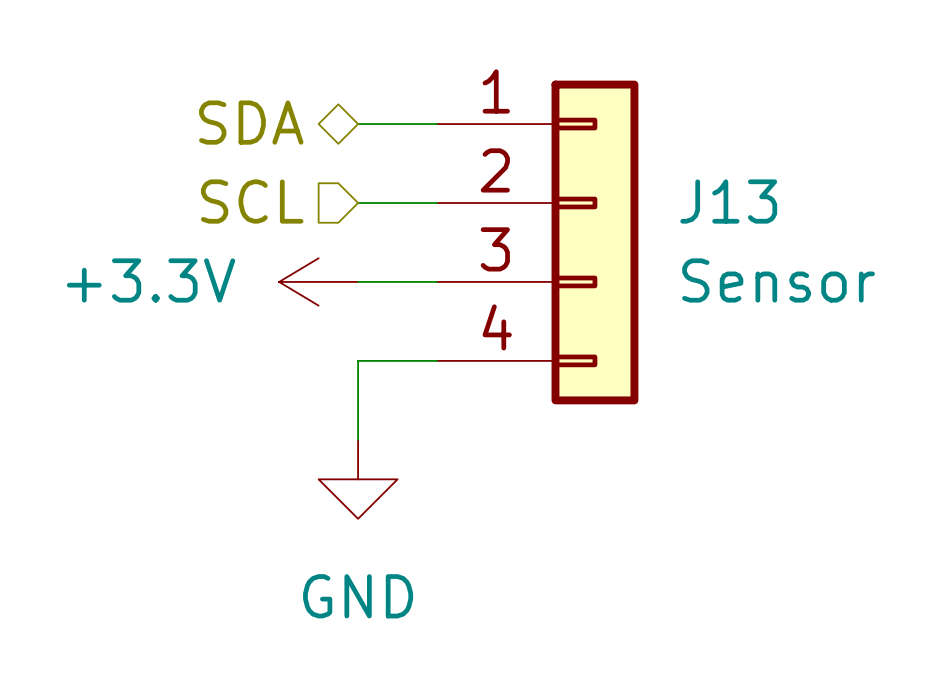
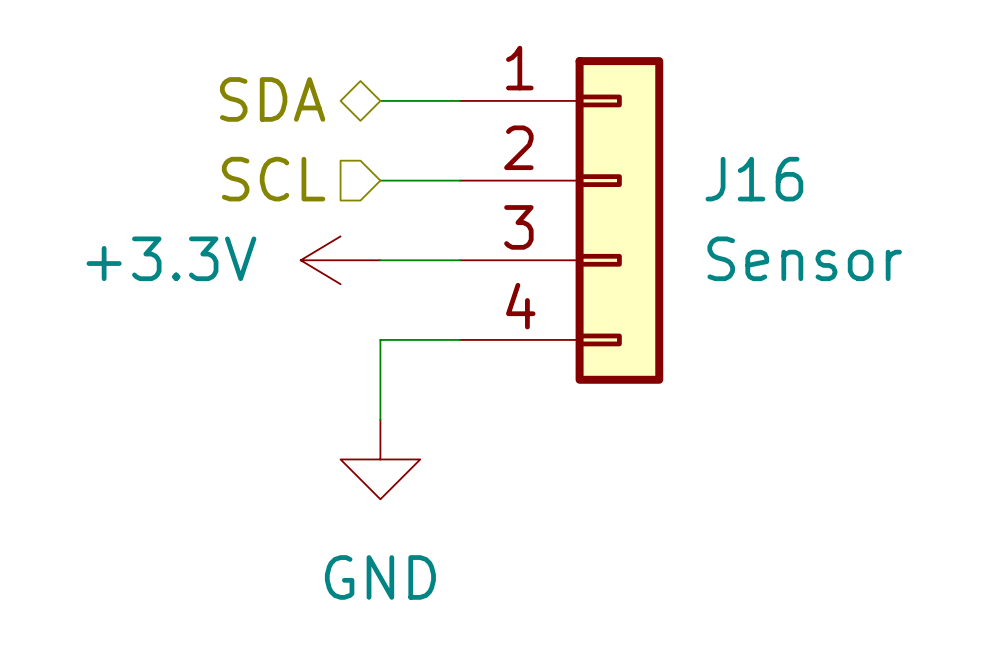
J13 name: J13 (728, 201) -> J16 (754, 179)

